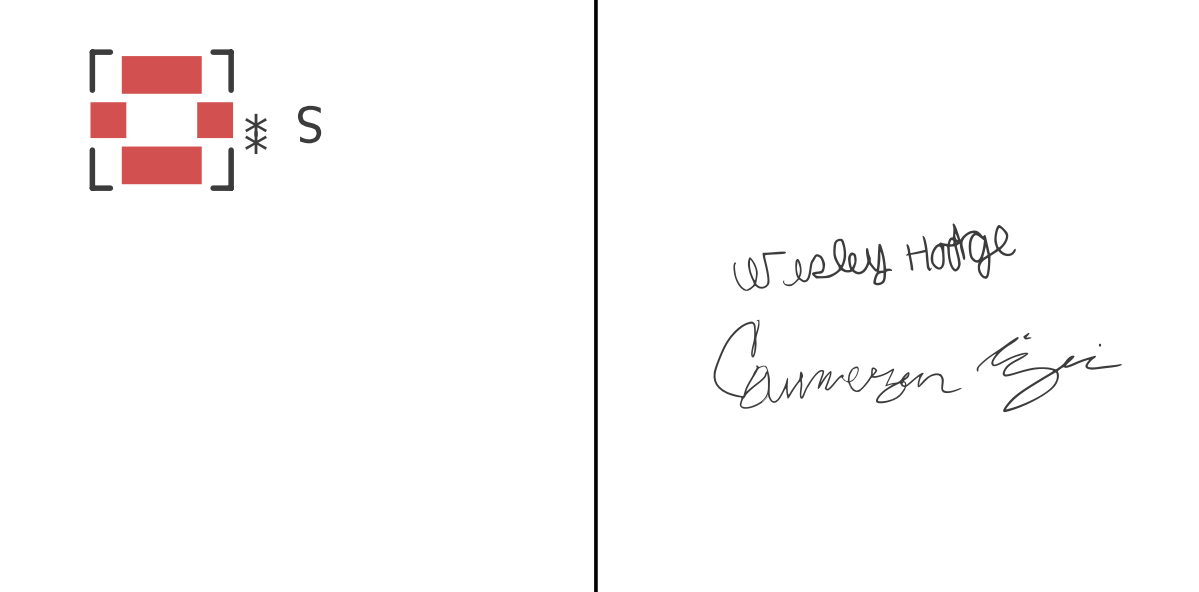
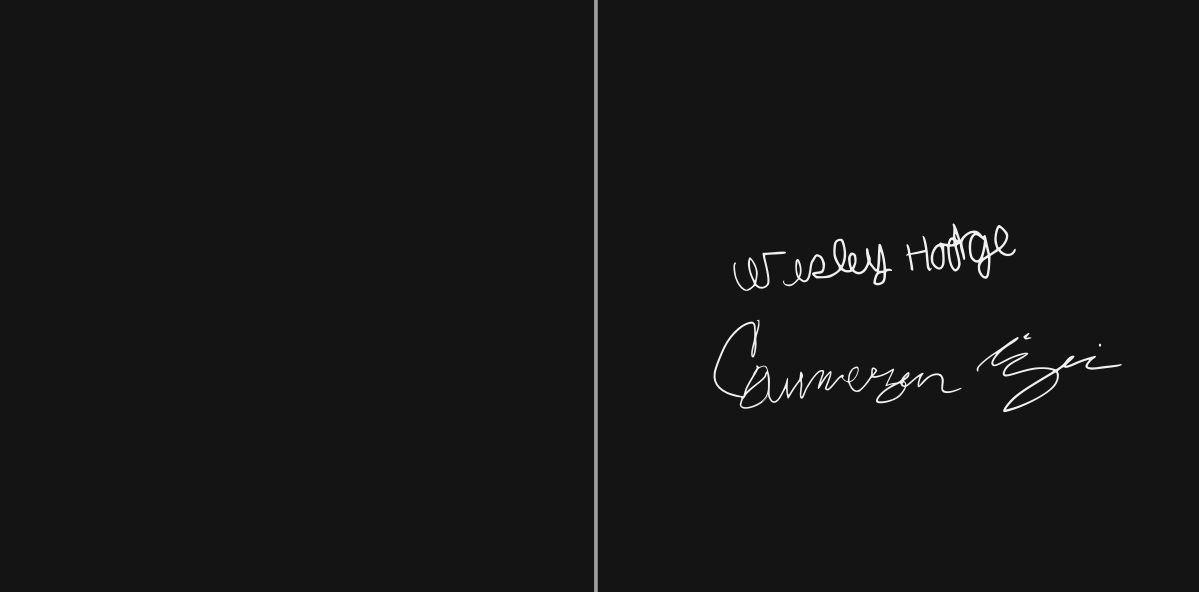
part: (161, 120) -> none

